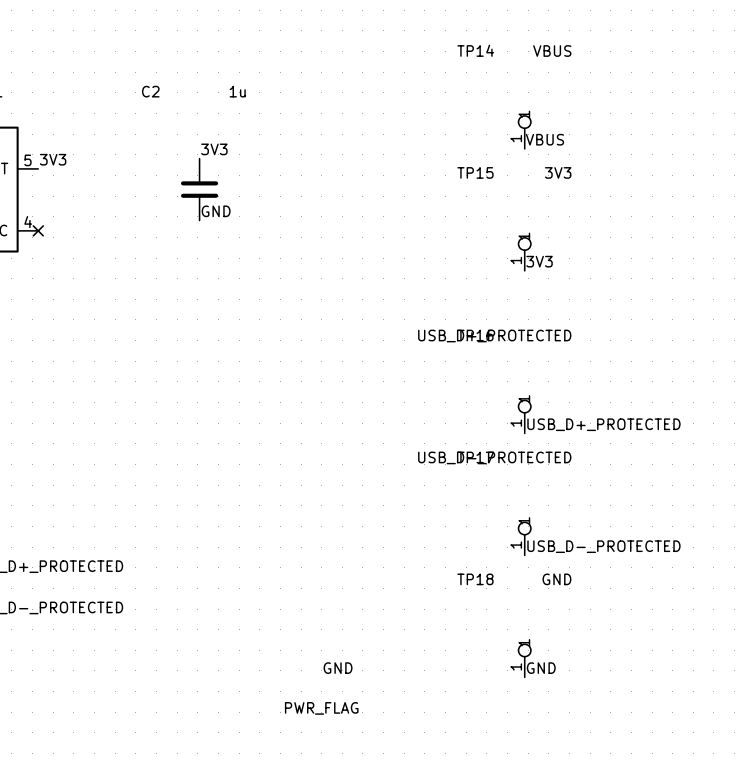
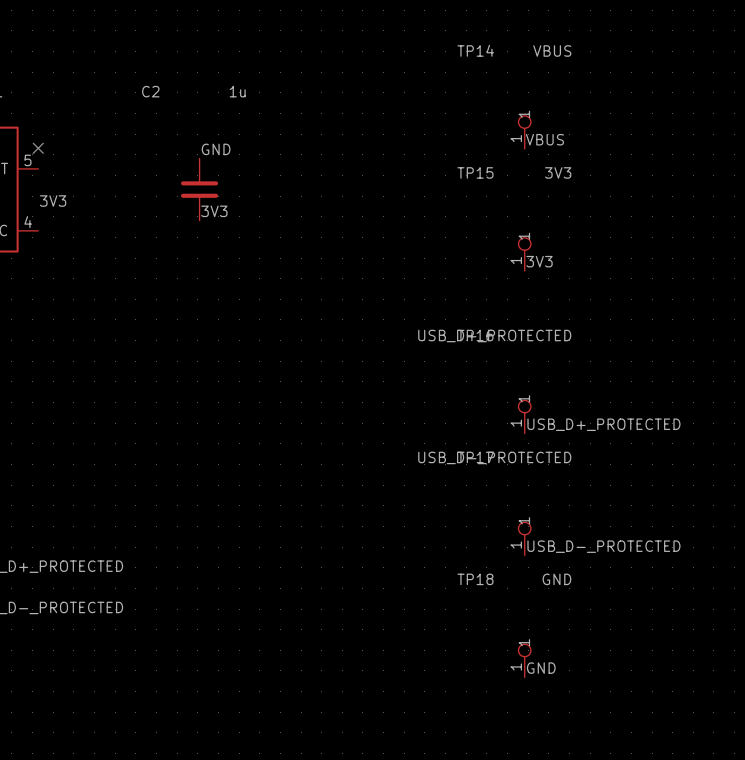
no-connect mark: none -> (38, 148)
label: 3V3 (214, 149) -> GND (216, 149)
label position: 3V3 (53, 159) -> 3V3 (53, 201)
label: GND (216, 211) -> 3V3 (214, 211)
no-connect mark: (38, 230) -> none
label: GND (338, 668) -> none
power symbol: PWR_FLAG (321, 708) -> none

